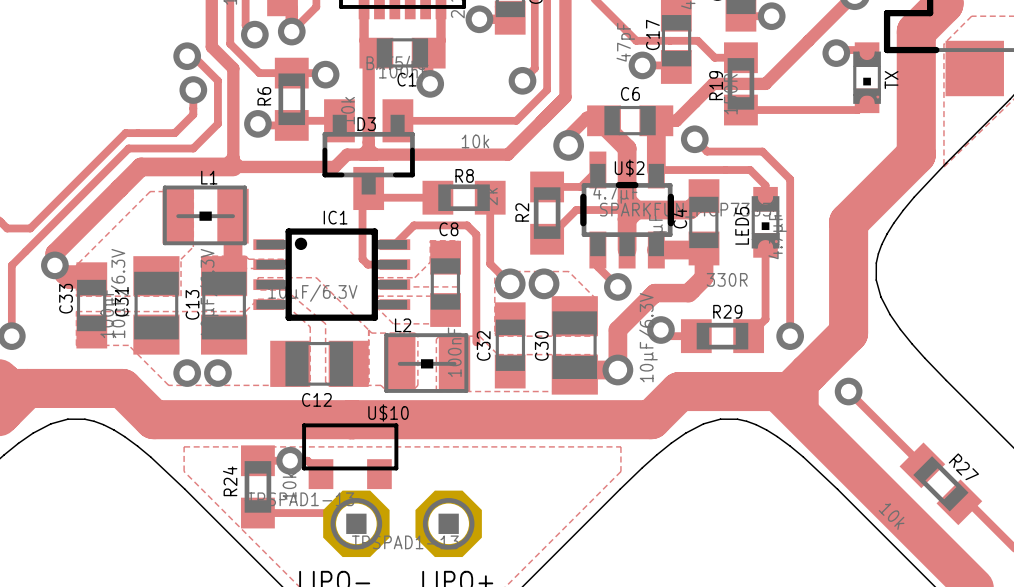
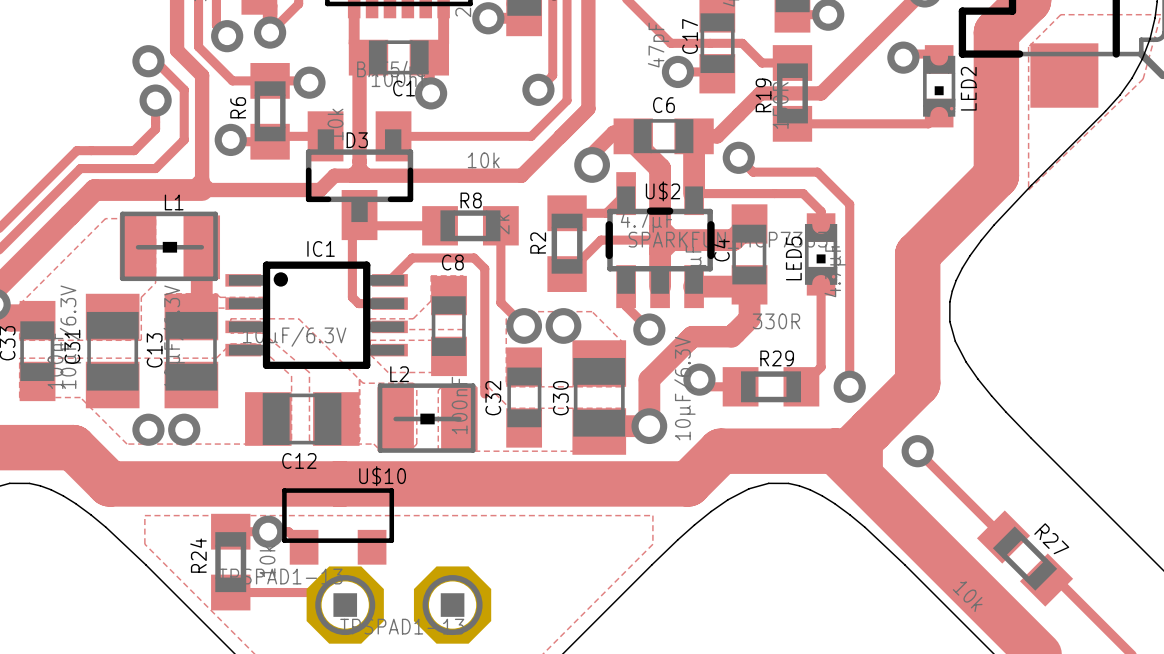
LED2 name: none -> LED2 (968, 88)
text: TX (891, 80) -> none

